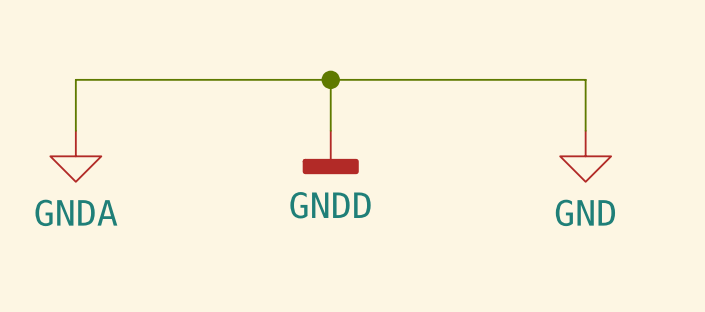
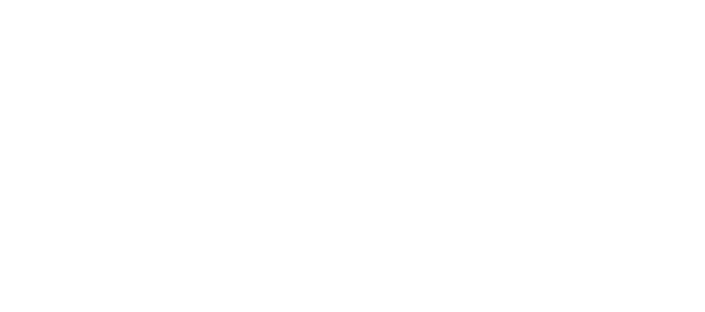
wire: (330, 79) (330, 130) -> none
junction: (330, 79) -> none
wire: (75, 130) (75, 79) (585, 79) (585, 130) -> none
power symbol: GNDD (330, 152) -> none
power symbol: GNDA (75, 156) -> none
power symbol: GND (585, 156) -> none

